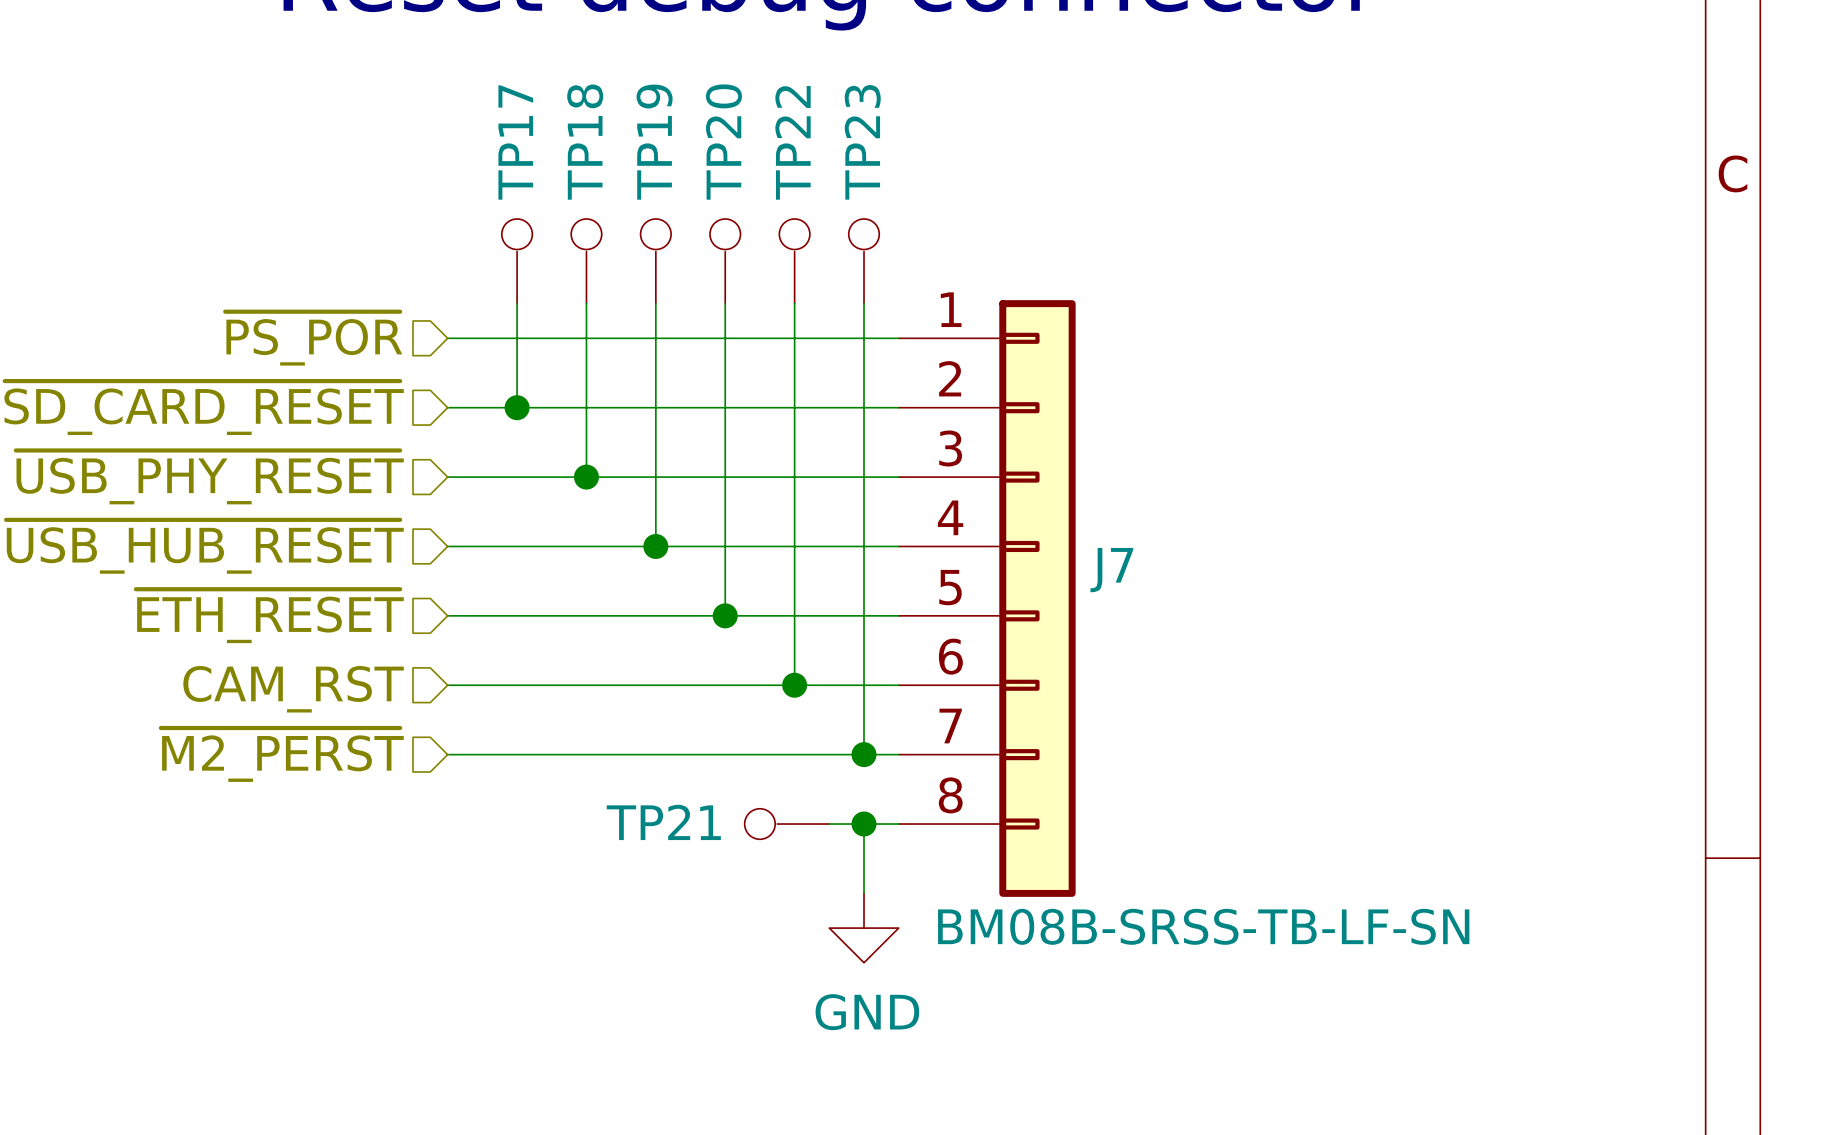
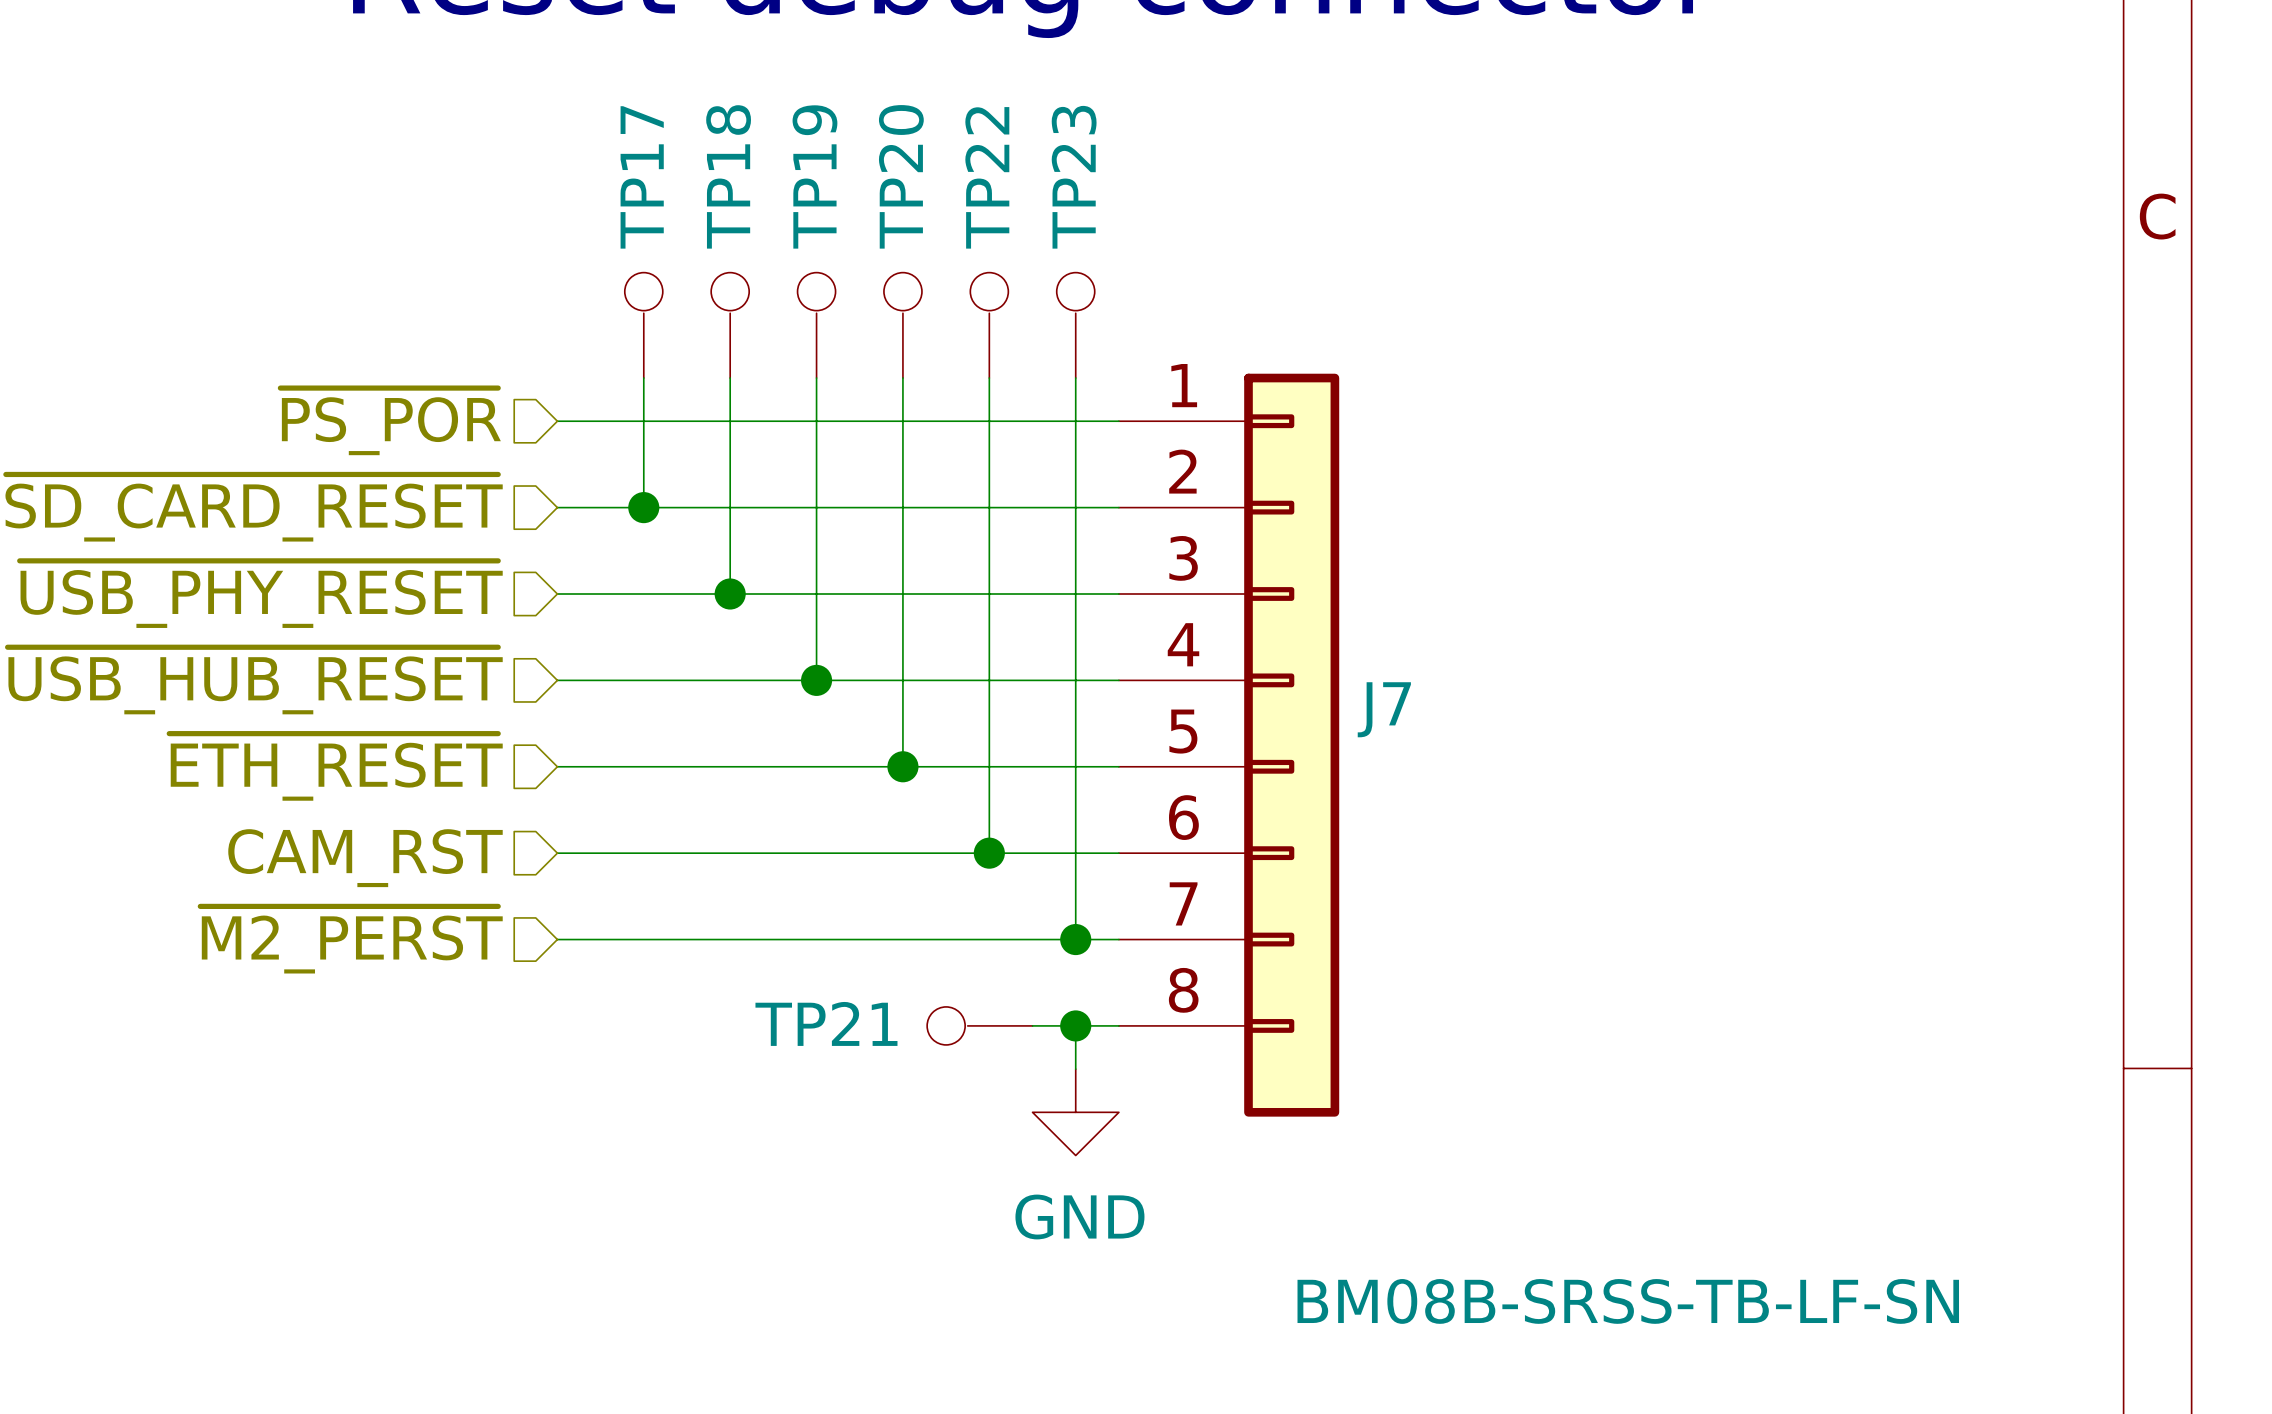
J7 value position: BM08B-SRSS-TB-LF-SN (1203, 926) -> BM08B-SRSS-TB-LF-SN (1628, 1301)
power symbol position: GND (864, 928) -> GND (1075, 1112)

